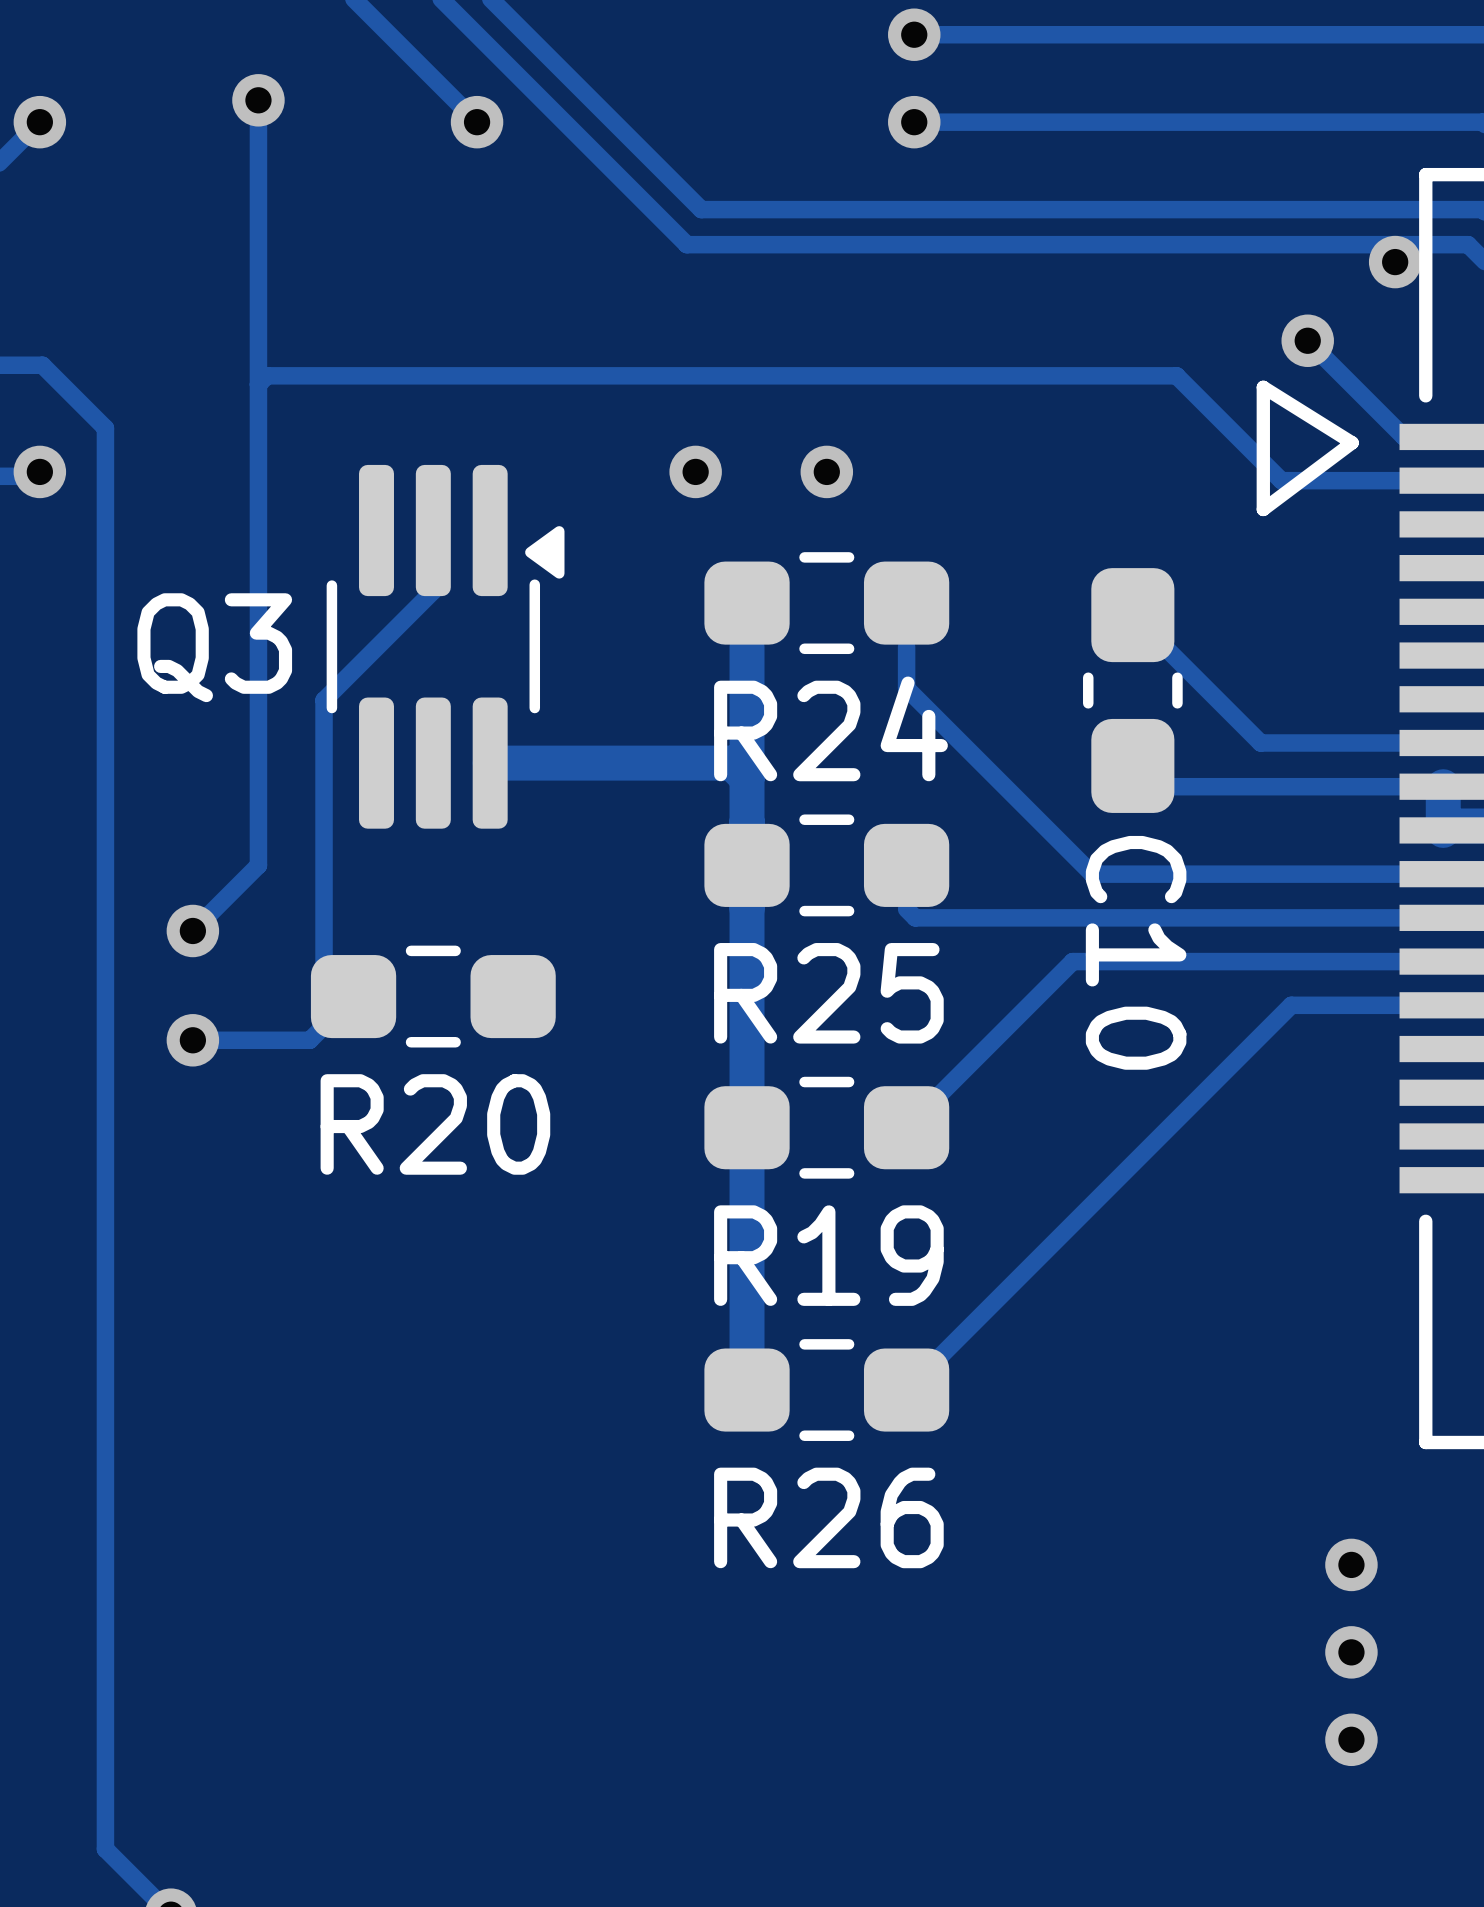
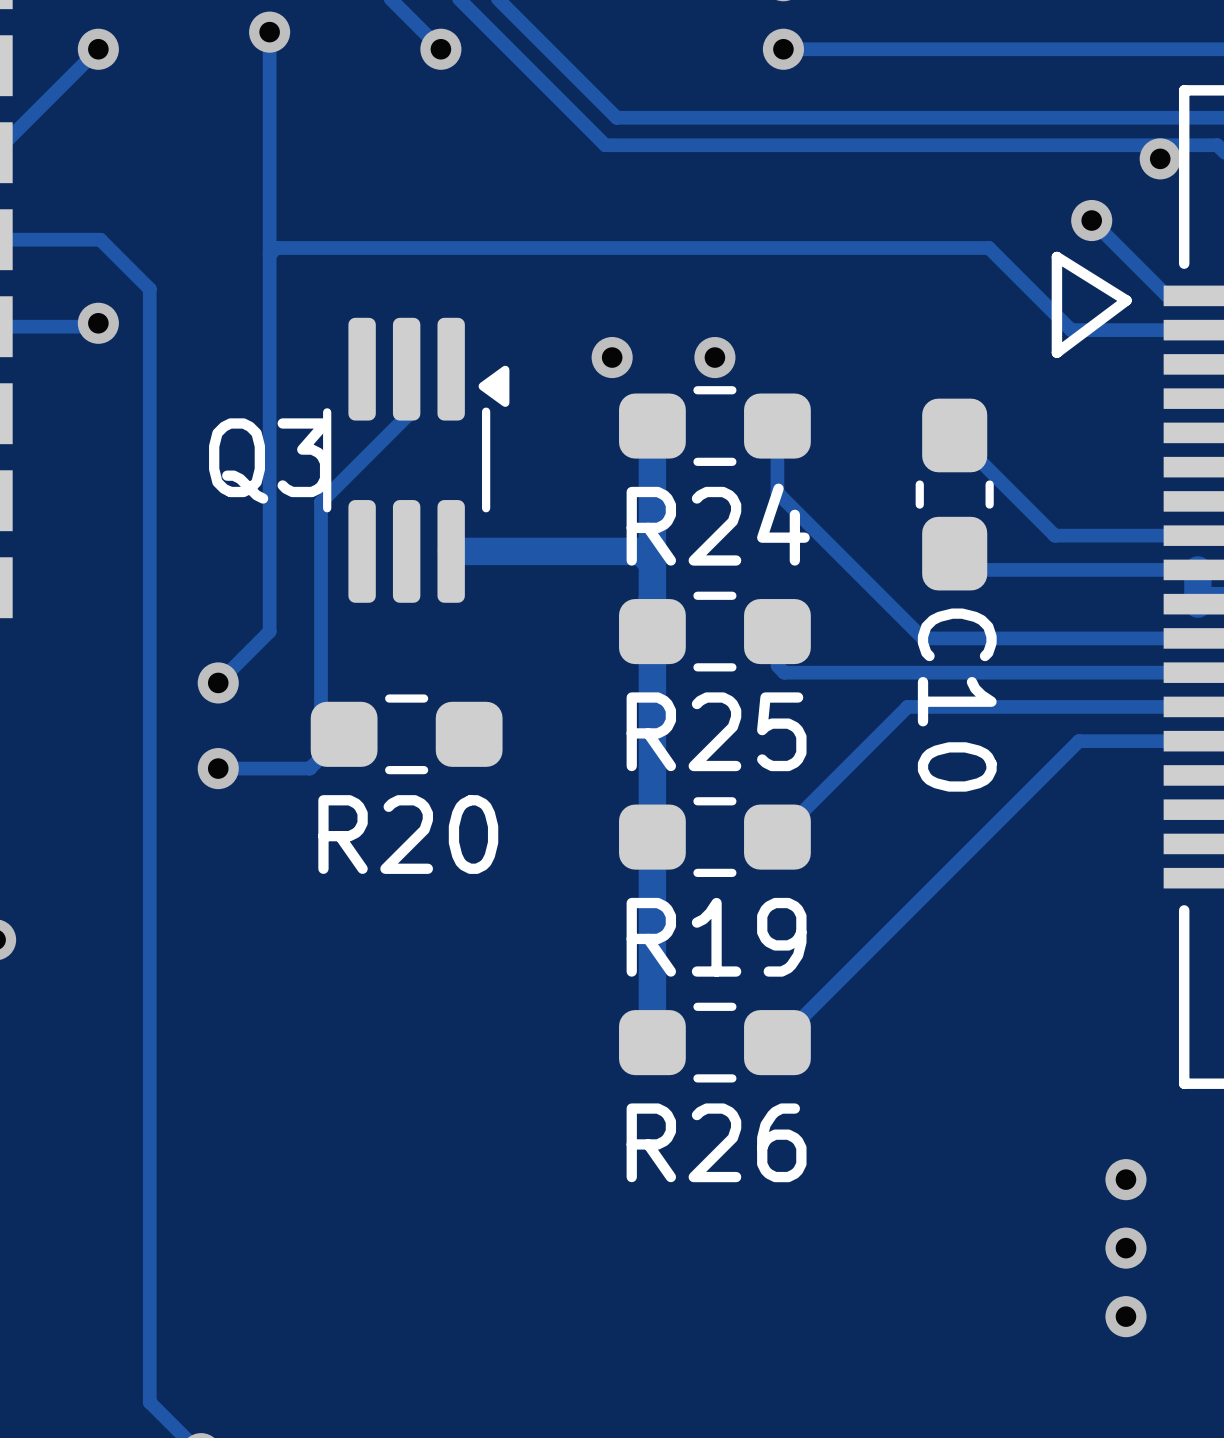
via position: (695, 471) -> (612, 357)
via position: (826, 471) -> (714, 357)
Q3 name position: Q3 (214, 647) -> Q3 (269, 461)

